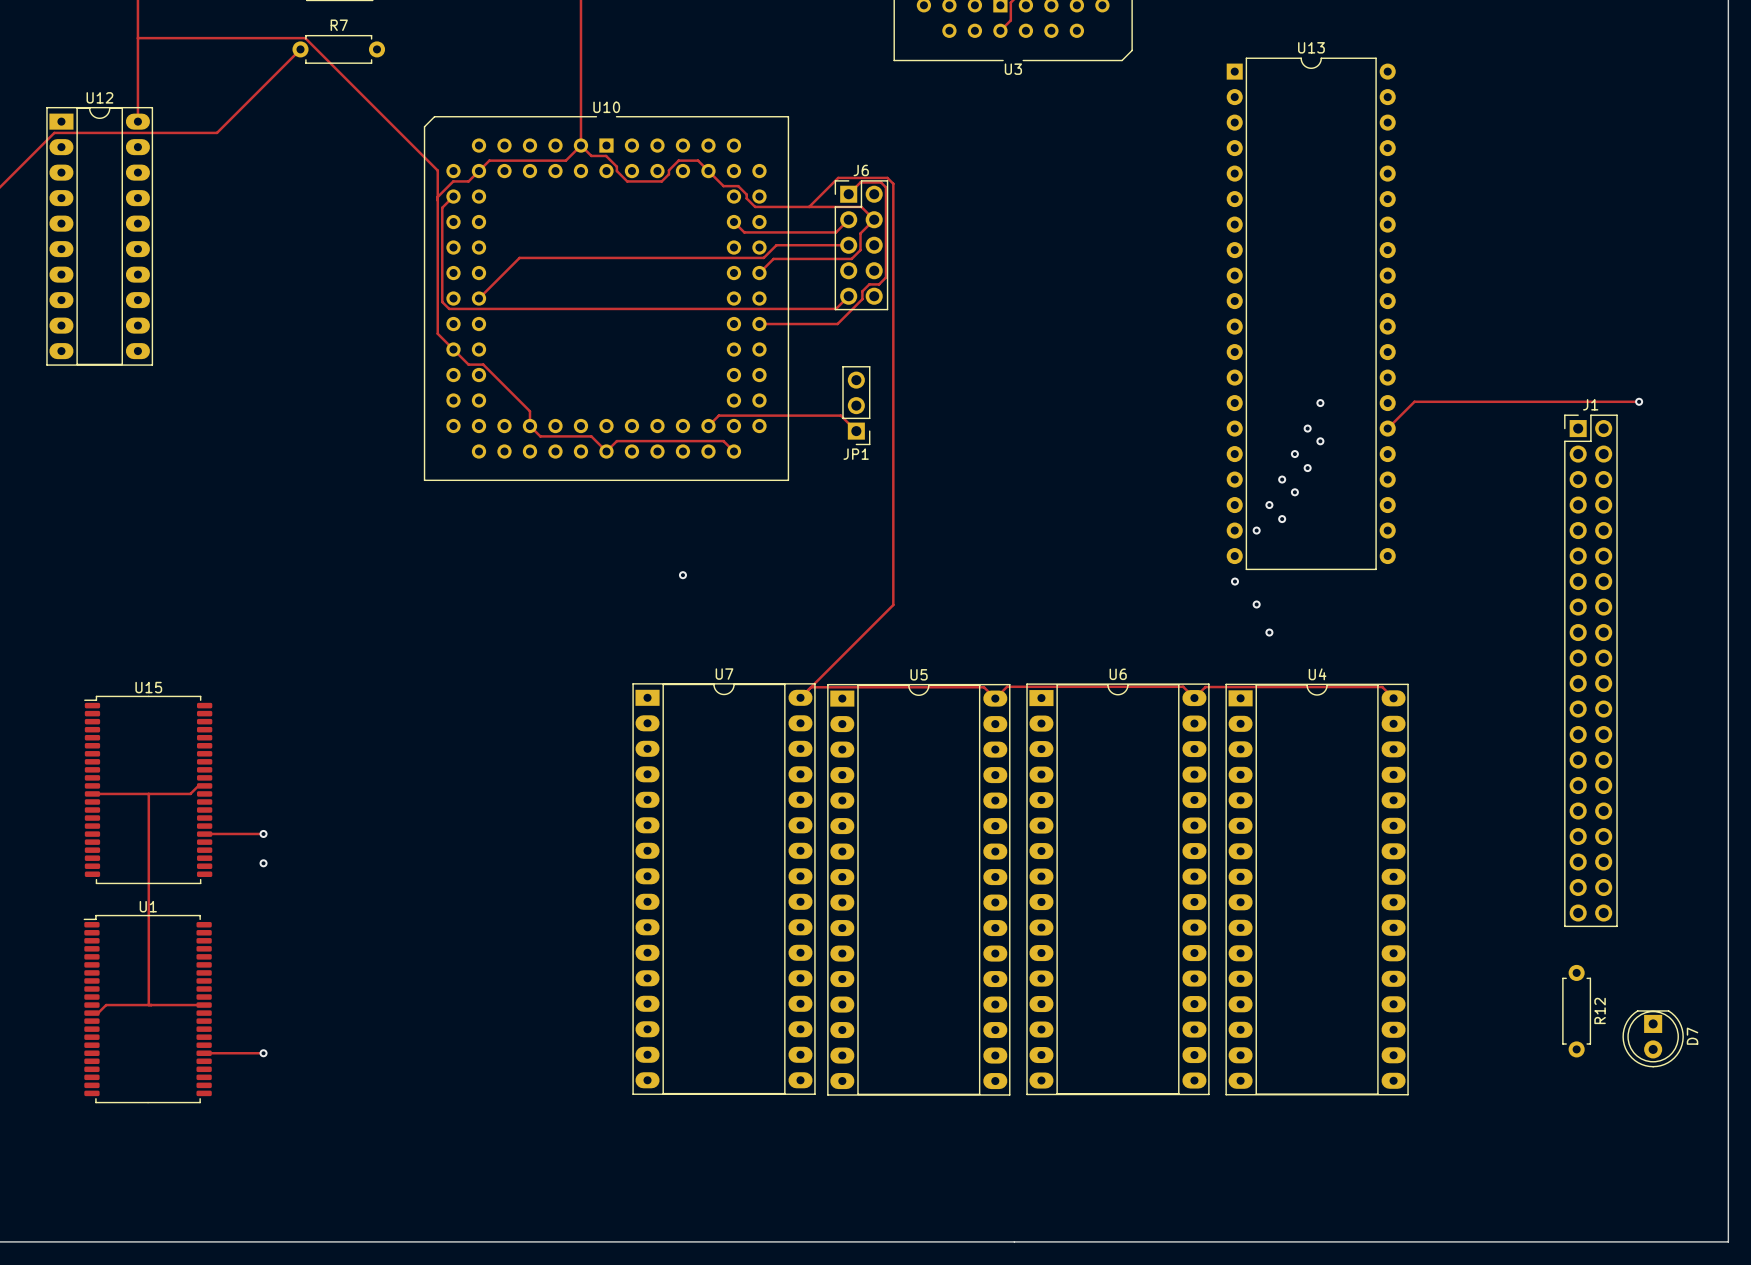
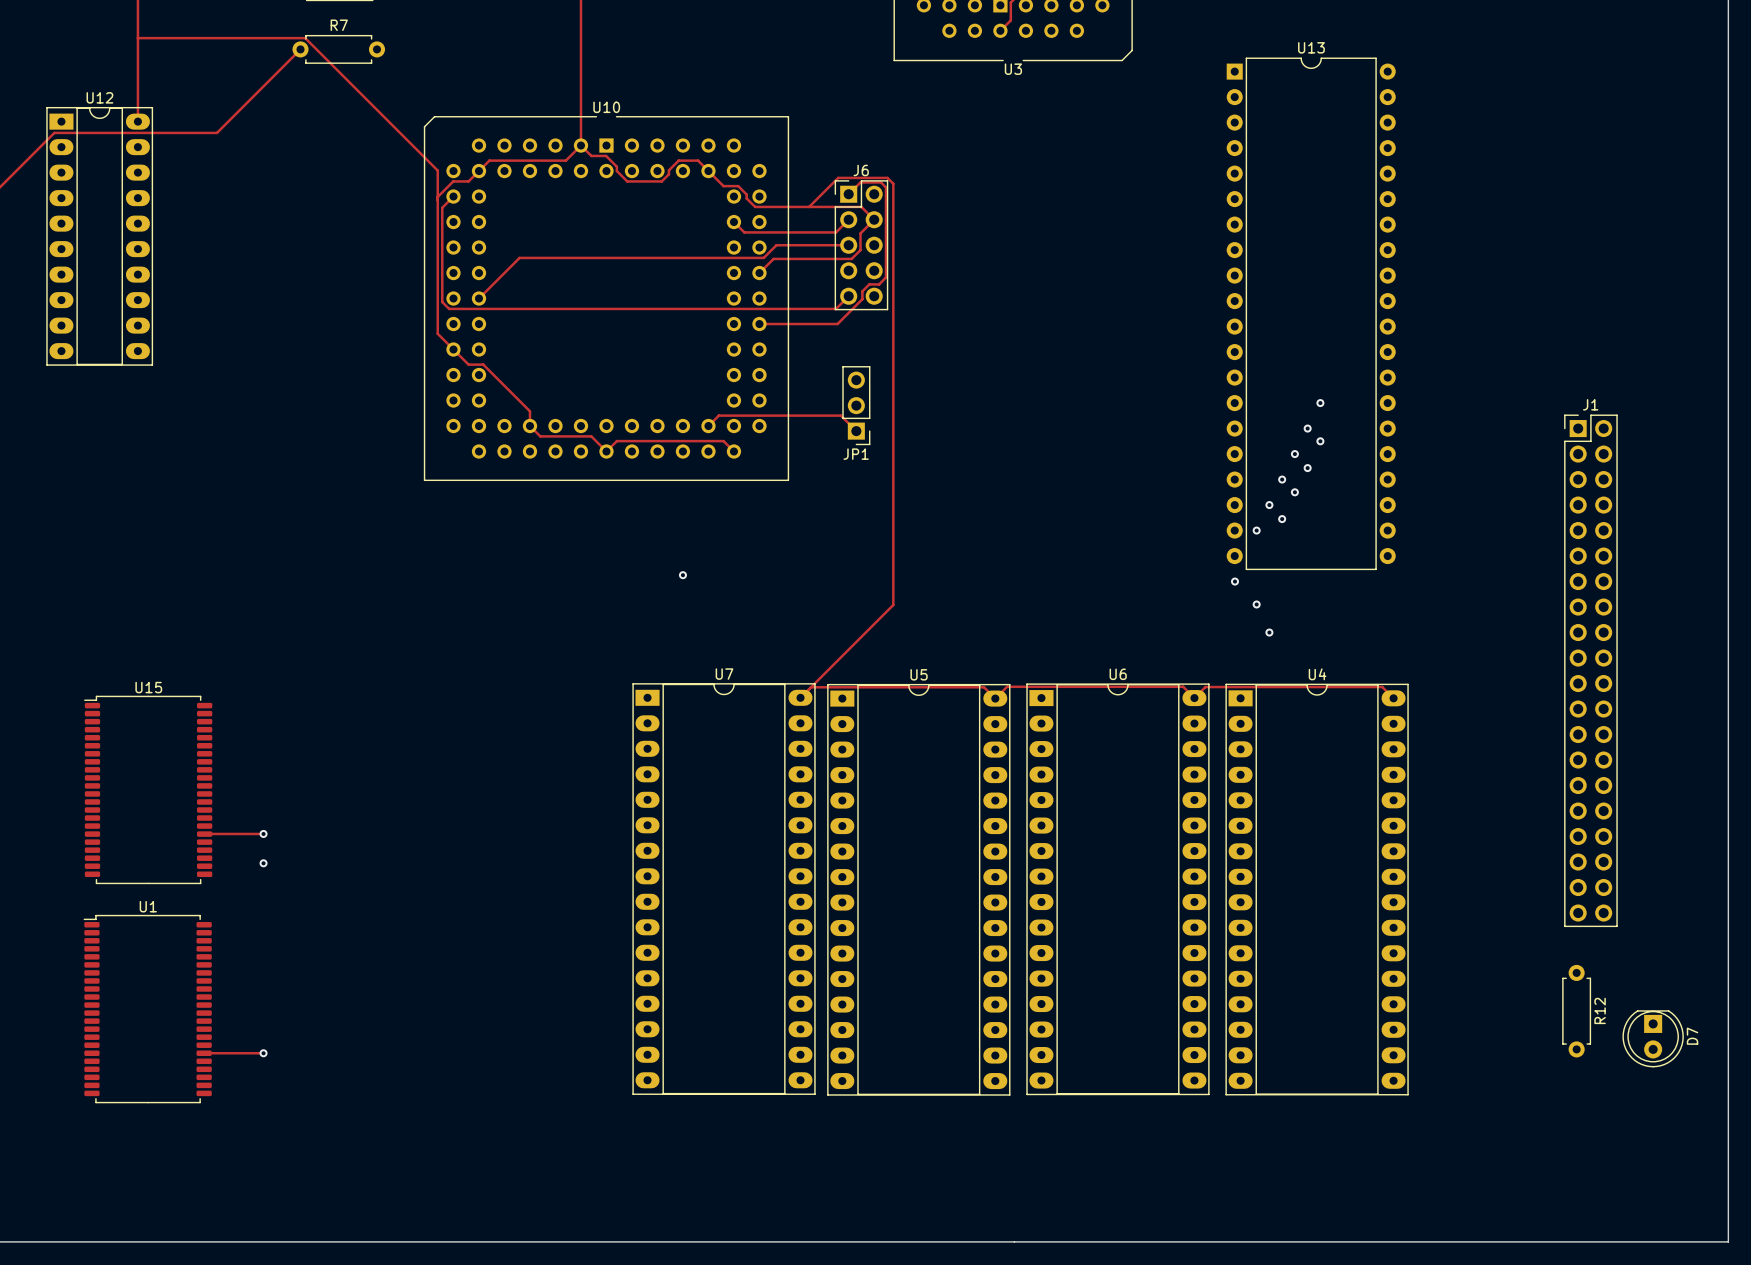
track: (1639, 401) (1414, 401) (1387, 428) -> none
via: (1639, 401) -> none
track: (204, 785) (198, 785) (190, 793) (92, 793) -> none
track: (148, 793) (148, 1005) -> none
track: (204, 1005) (106, 1005) (98, 1013) (91, 1013) -> none

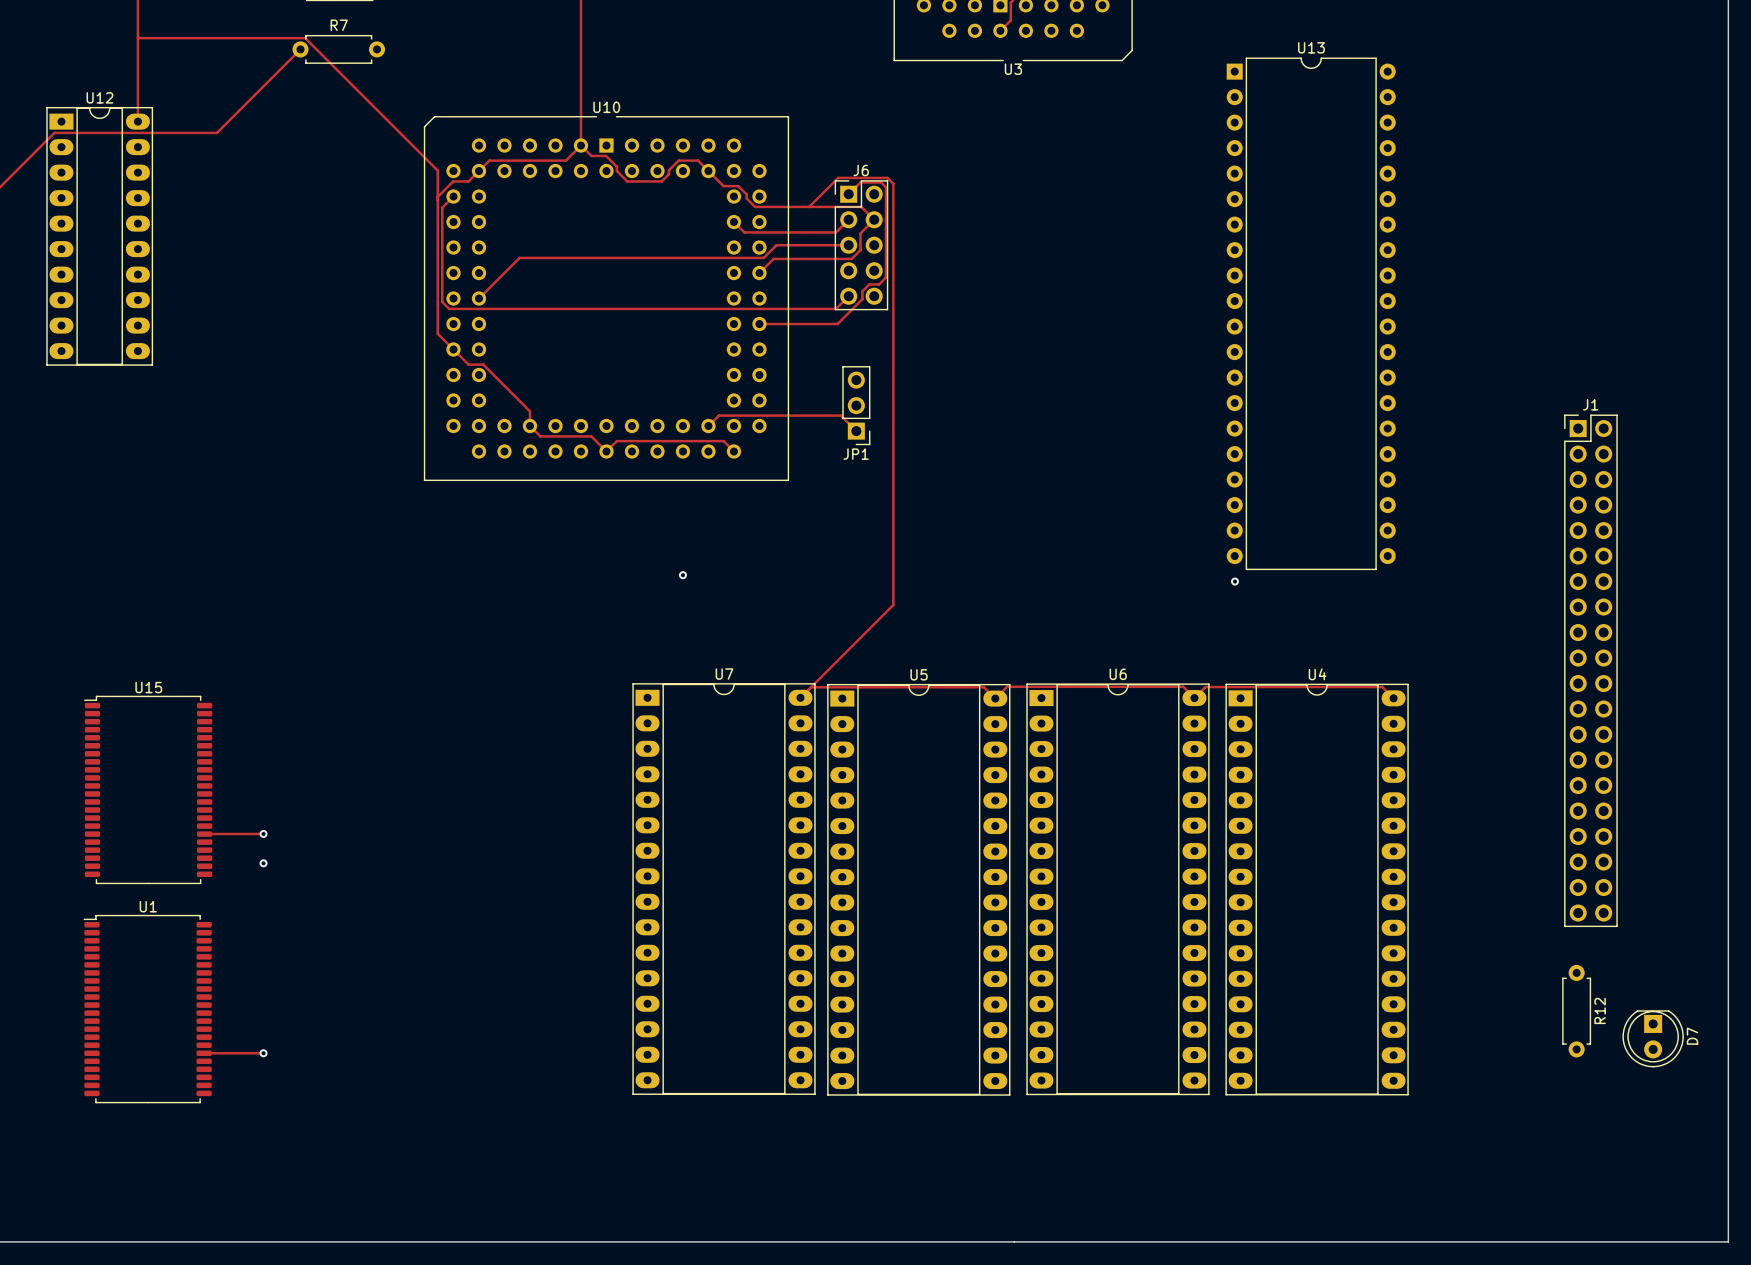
via: (1320, 403) -> none
via: (1307, 428) -> none
via: (1320, 441) -> none
via: (1294, 454) -> none
via: (1307, 468) -> none
via: (1282, 479) -> none
via: (1294, 492) -> none
via: (1269, 505) -> none
via: (1282, 519) -> none
via: (1256, 530) -> none
via: (1256, 604) -> none
via: (1269, 632) -> none

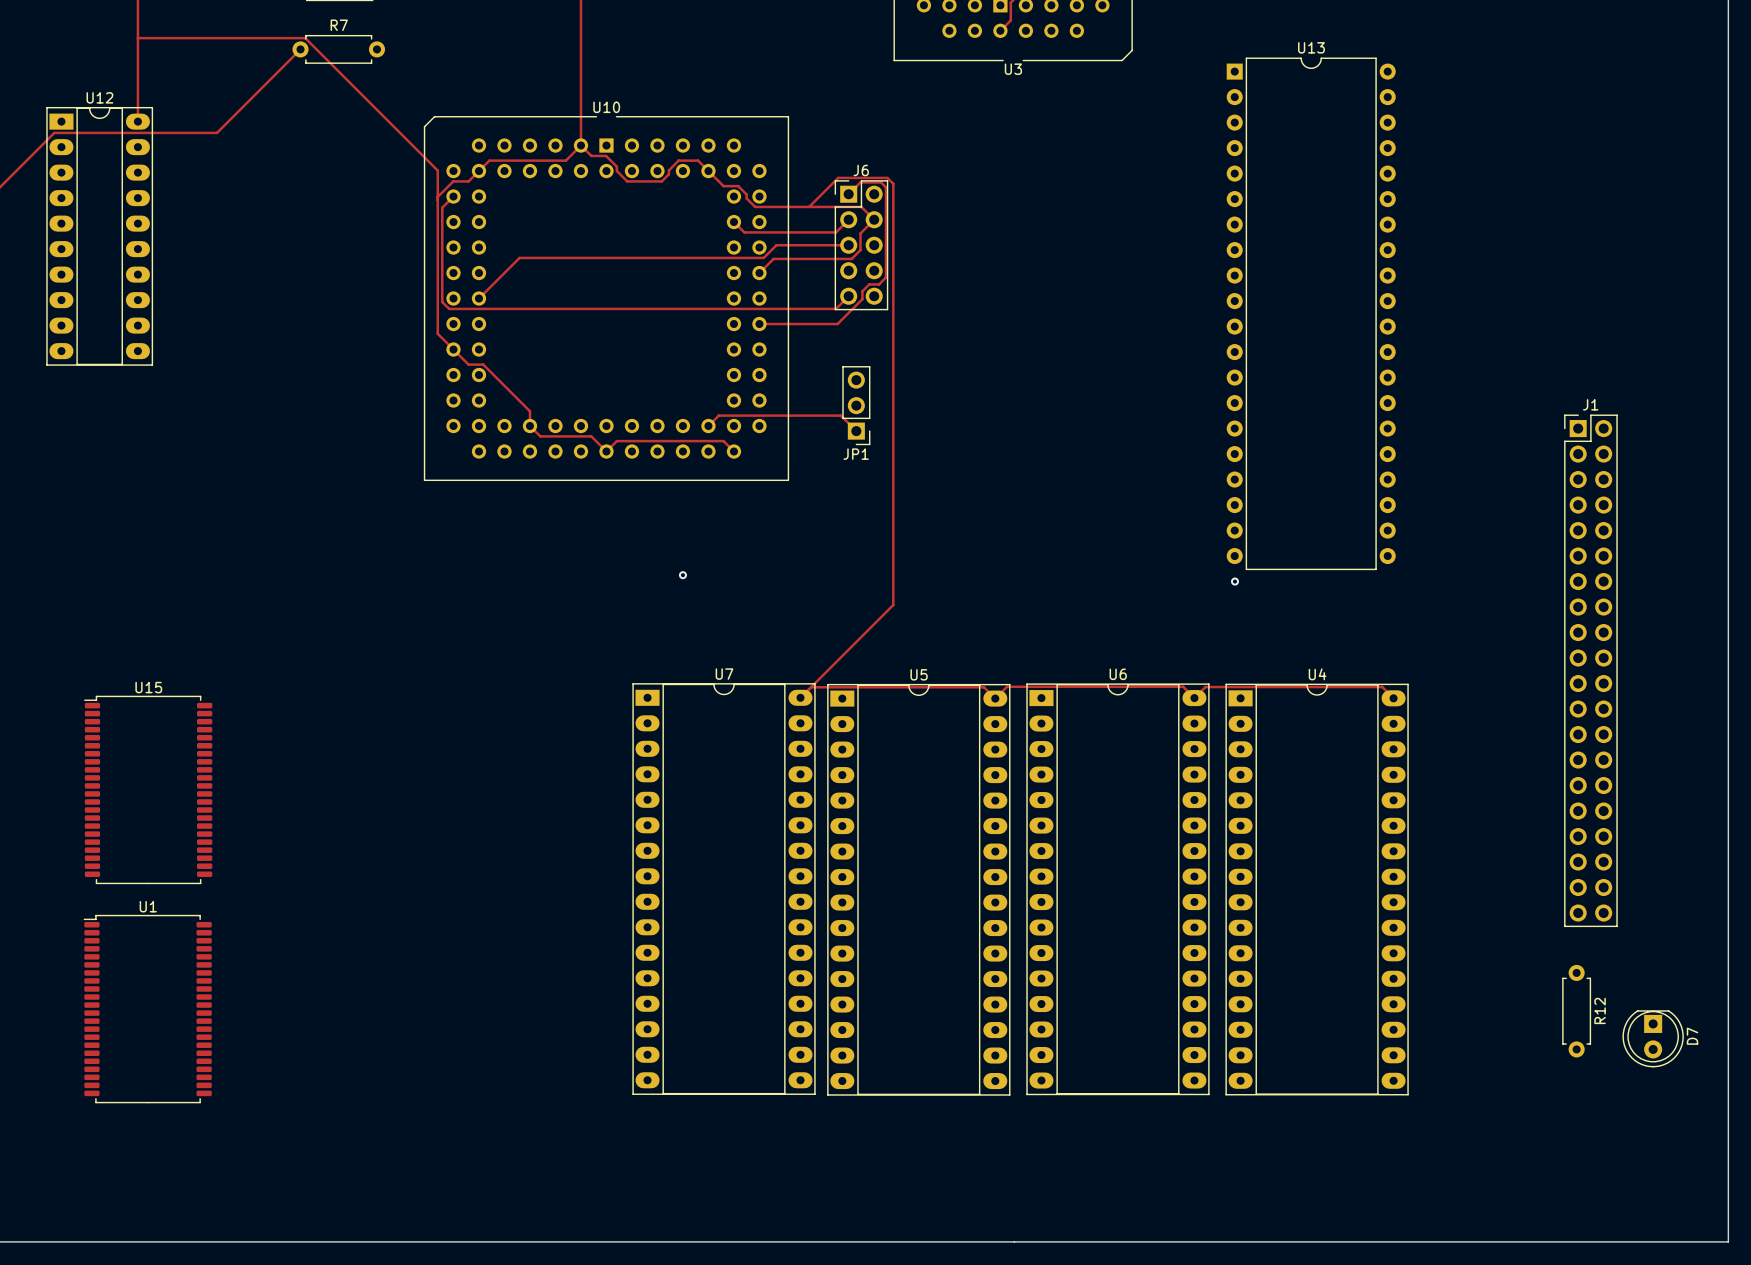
track: (204, 833) (263, 833) -> none
via: (263, 833) -> none
via: (263, 863) -> none
track: (204, 1053) (263, 1053) -> none
via: (263, 1053) -> none

